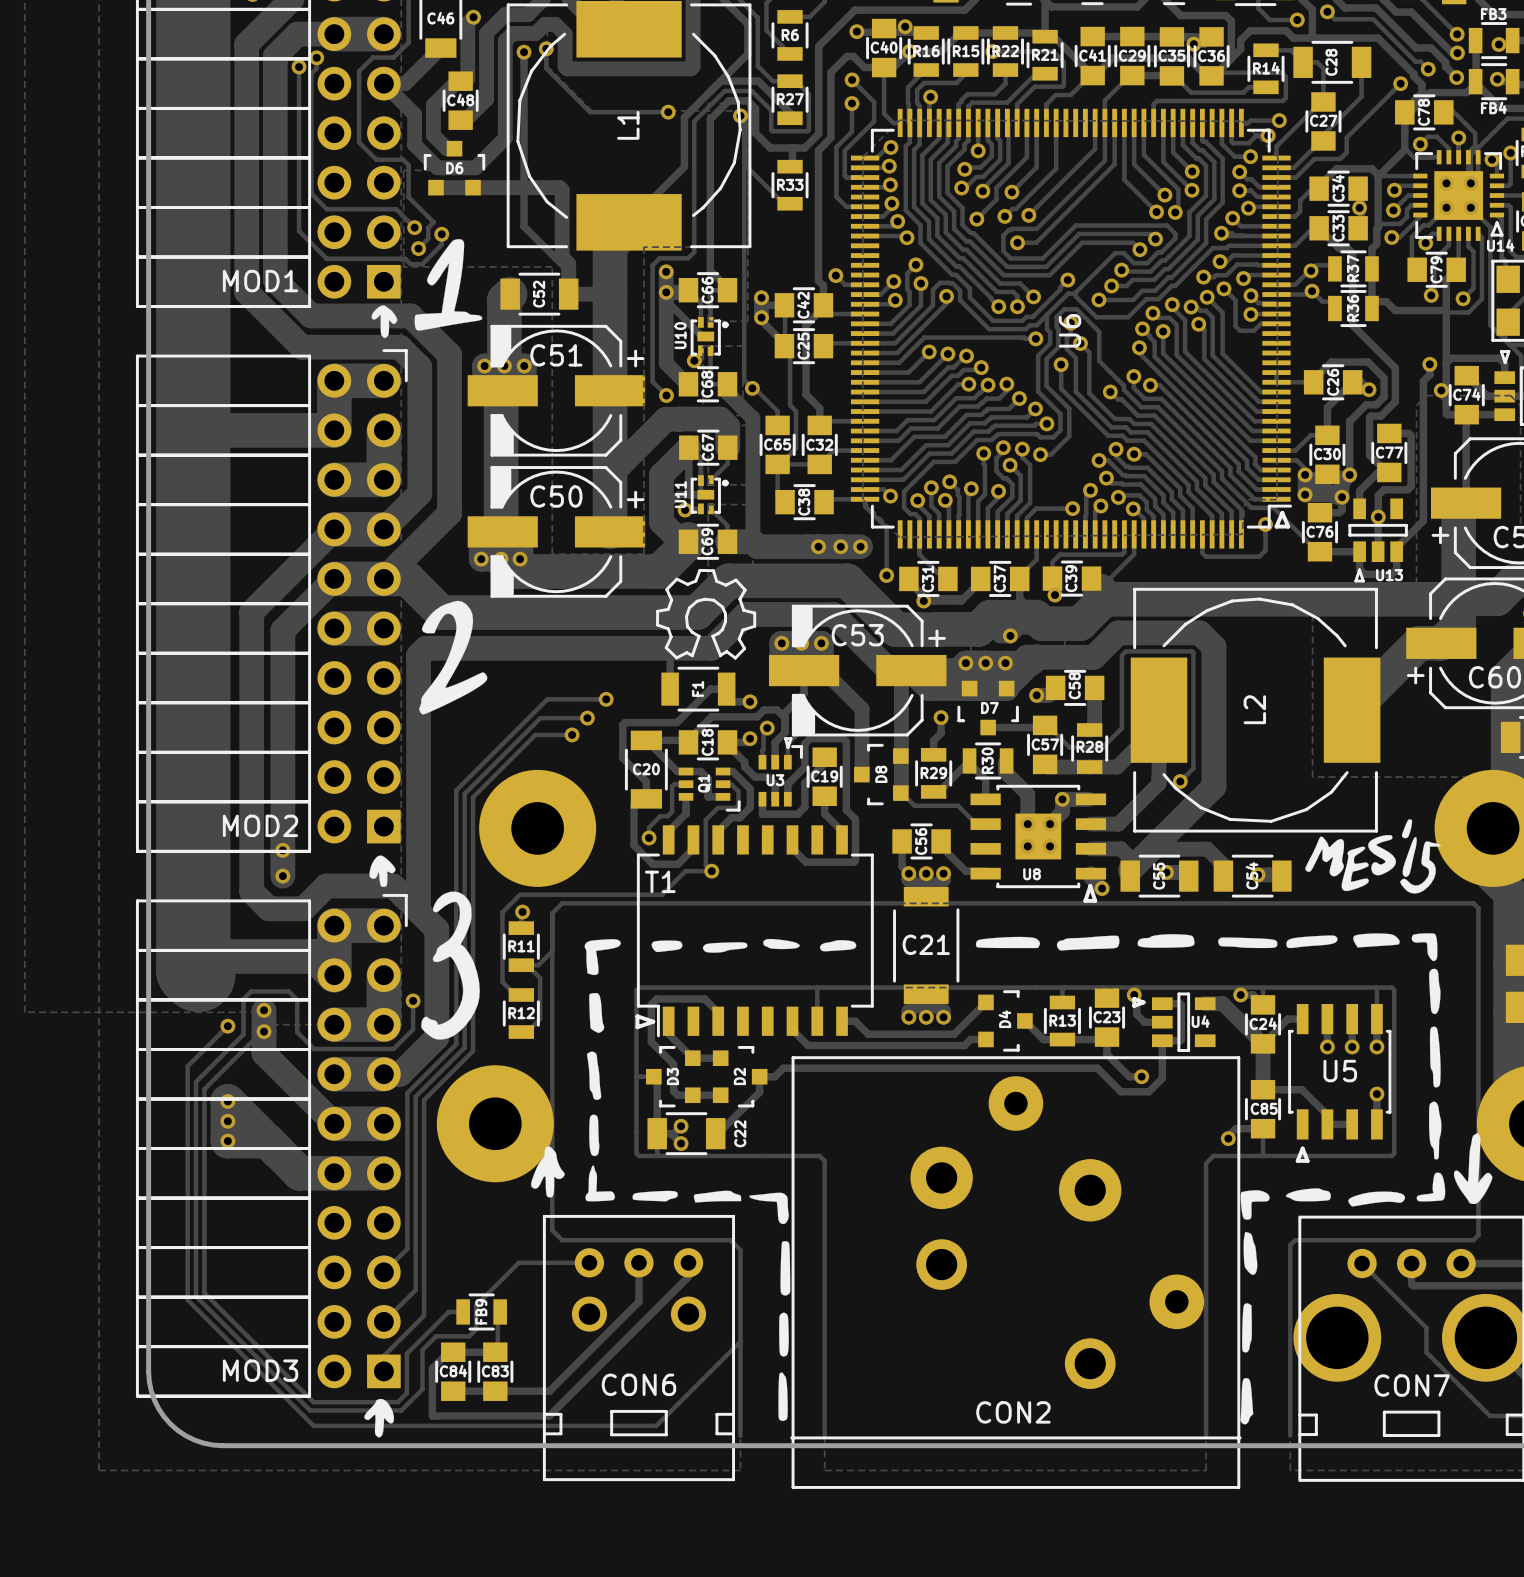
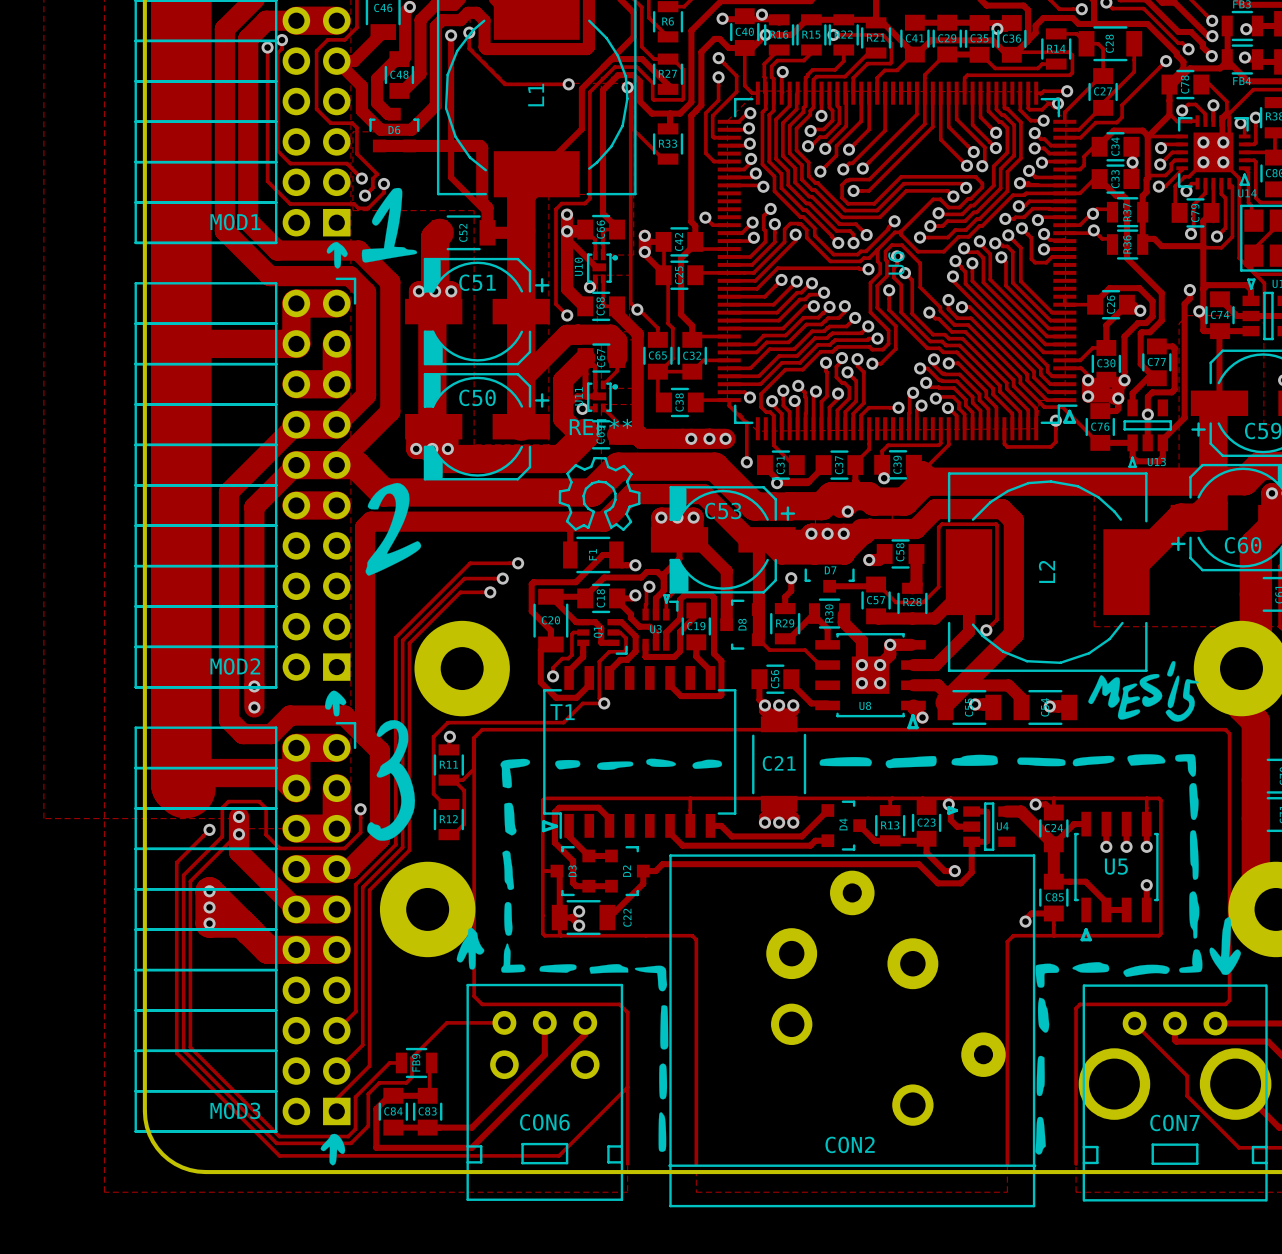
REF**: none -> (599, 493)

